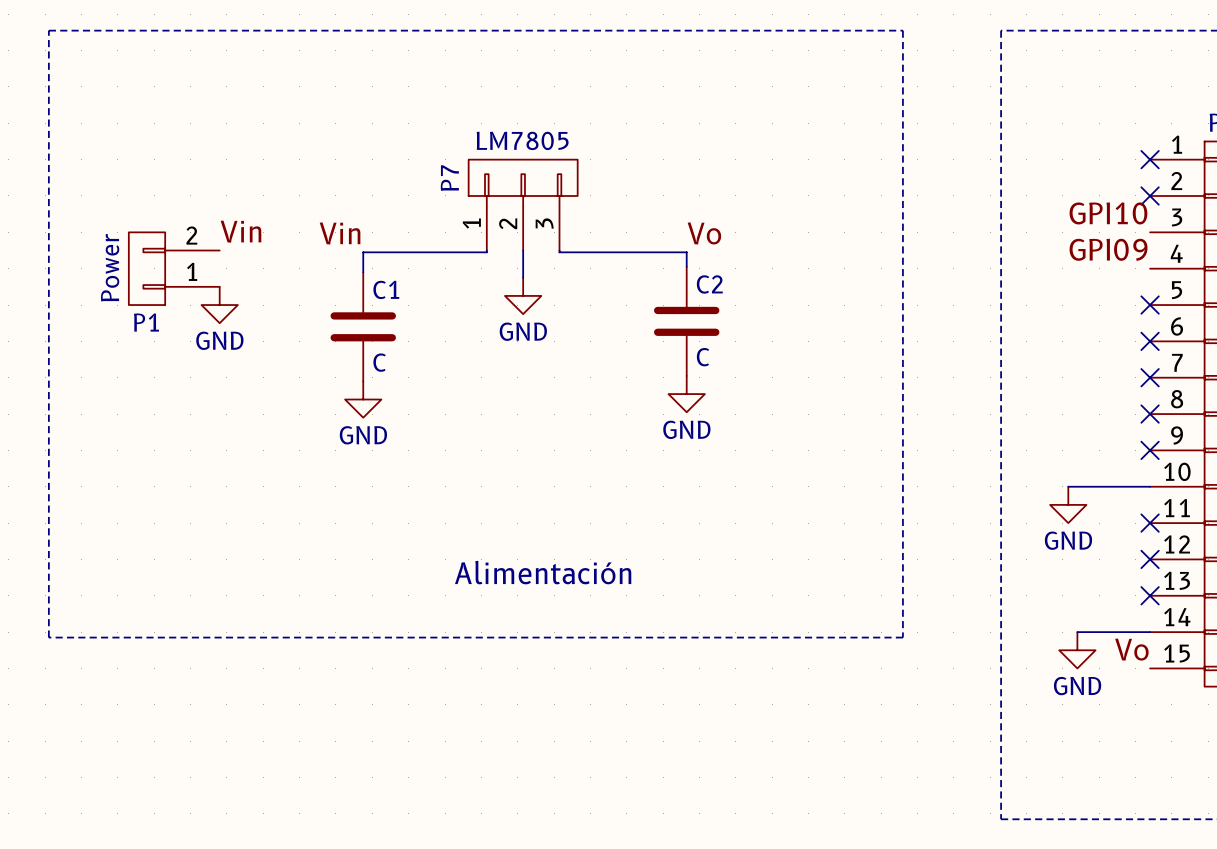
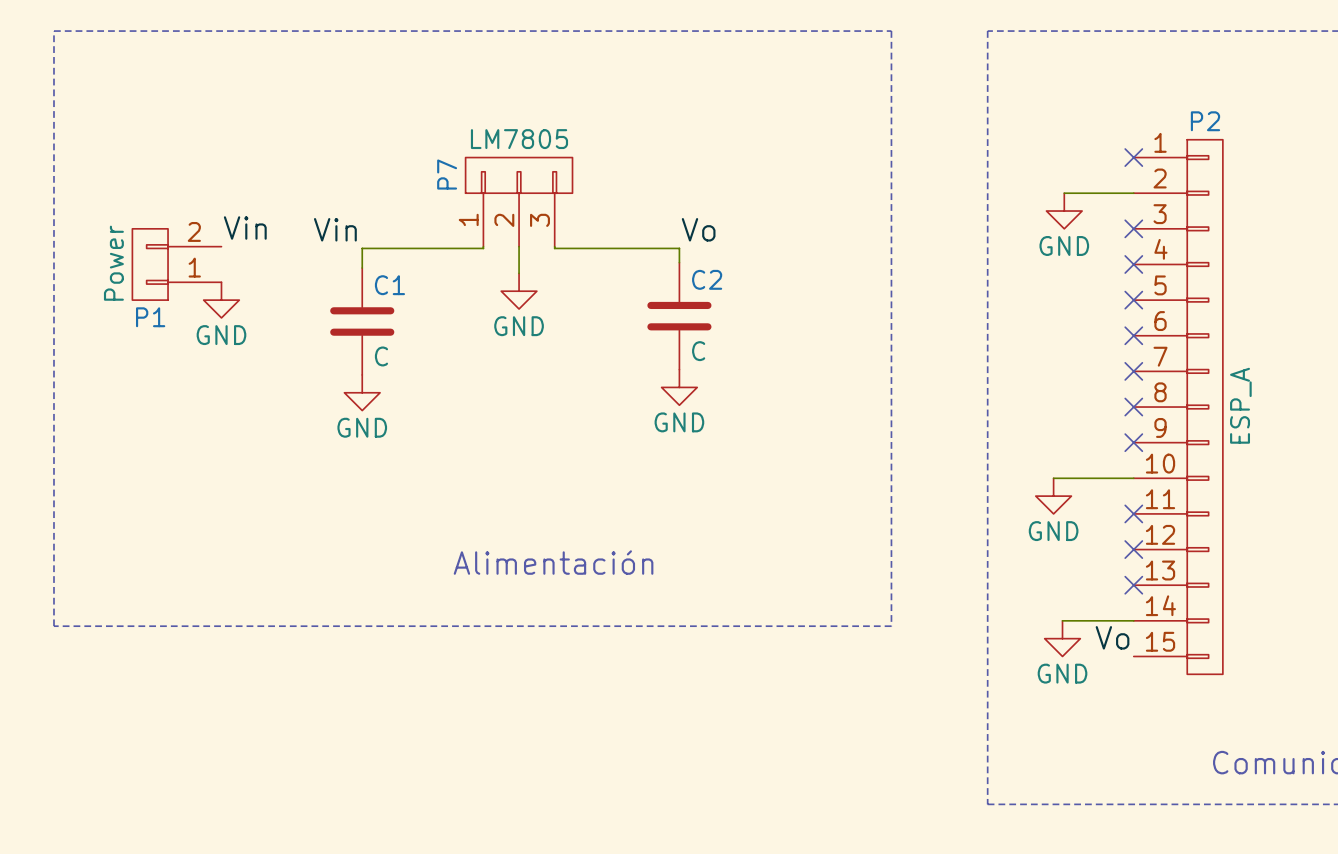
wire: none -> (1064, 193) (1133, 193)
no-connect mark: (1150, 195) -> none
label: GPI10 (1108, 213) -> none
power symbol: none -> GND (1064, 211)
no-connect mark: none -> (1133, 228)
label: GPI09 (1108, 249) -> none
no-connect mark: none -> (1133, 264)

